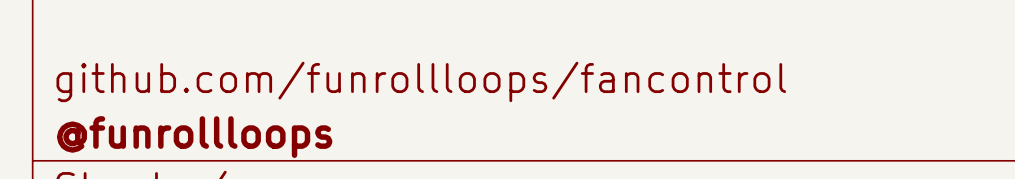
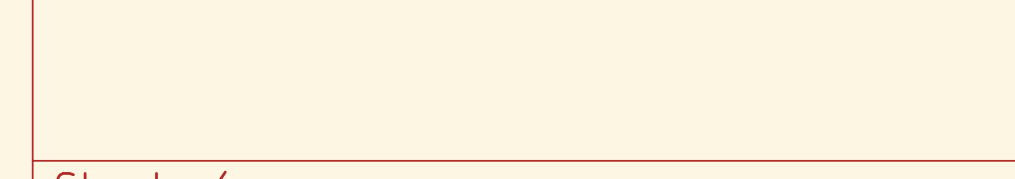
title block: github.com/funrollloops/fancontrol (421, 81) -> none
title block: @funrollloops (194, 137) -> none

